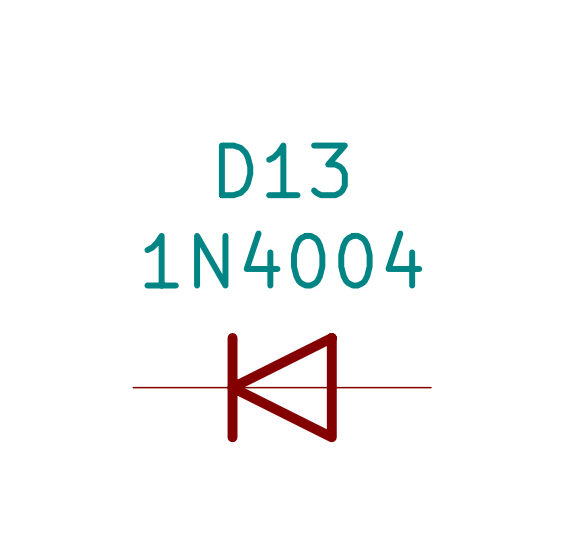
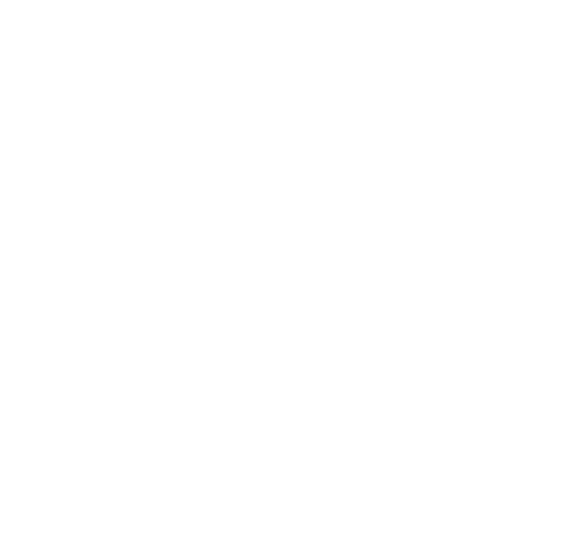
D13: 1N4004 (282, 387) -> none

